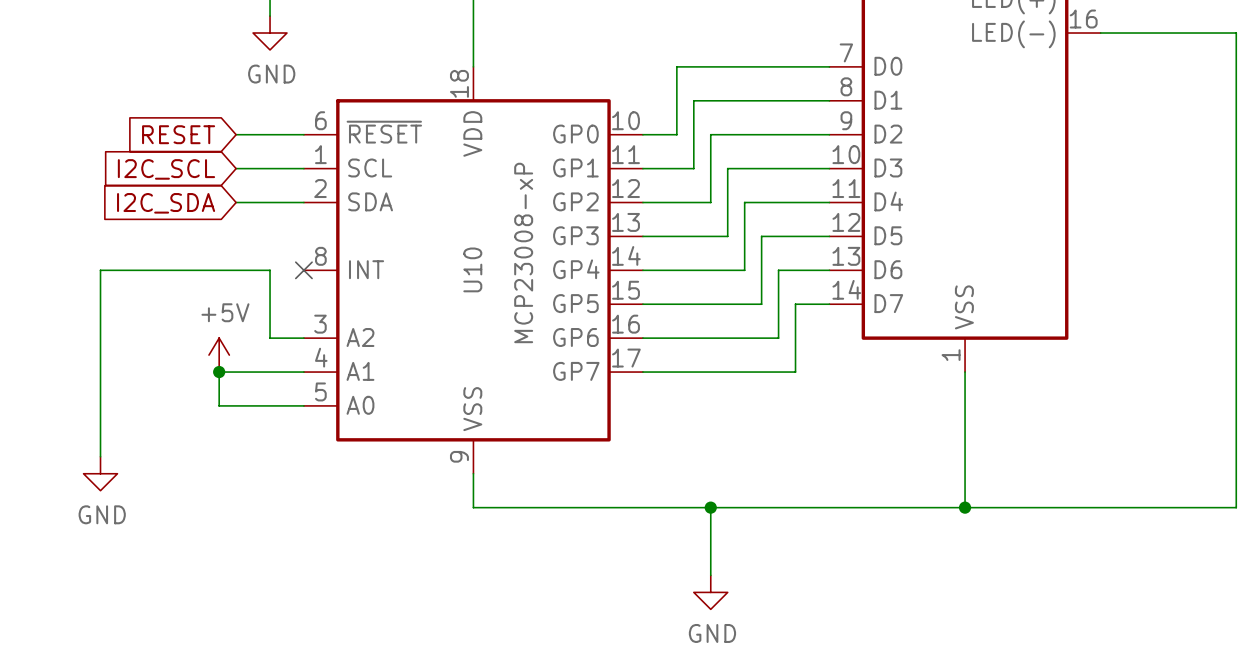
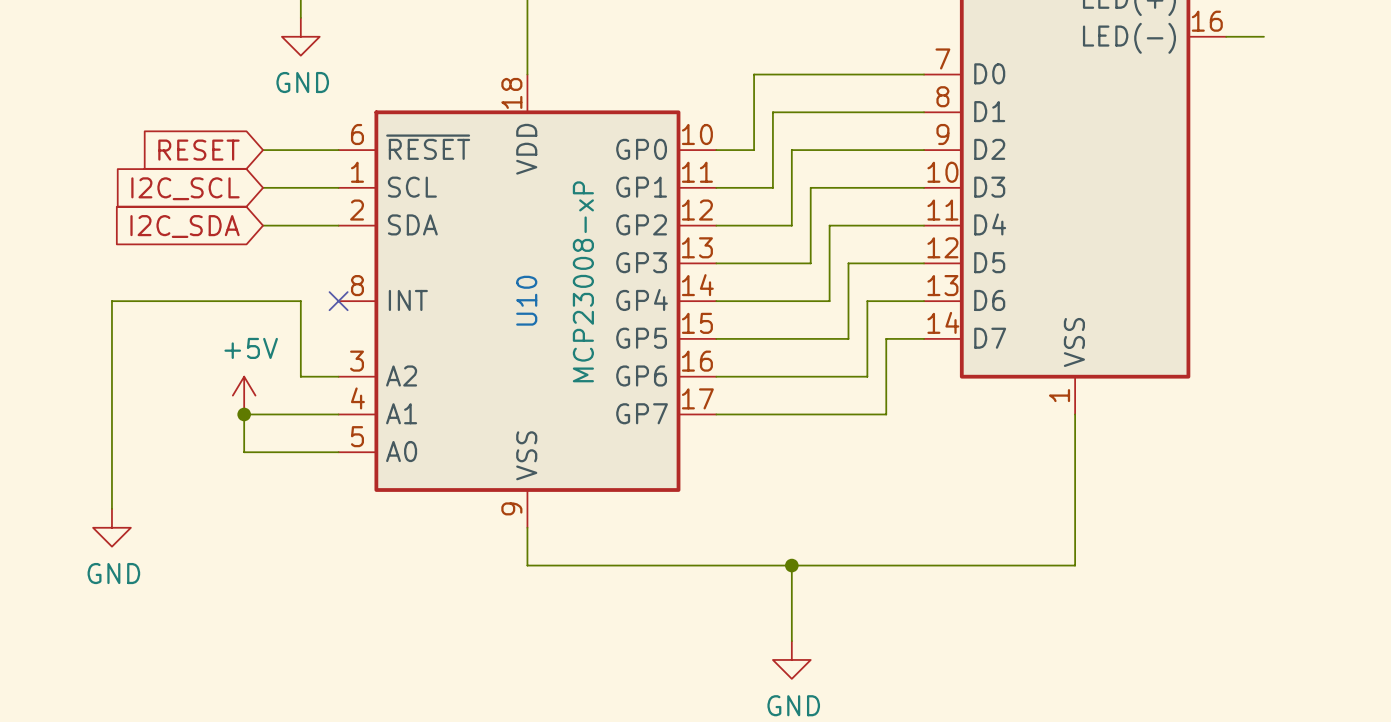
wire: (1134, 33) (1236, 33) (1236, 507) (965, 507) -> none
junction: (965, 507) -> none

